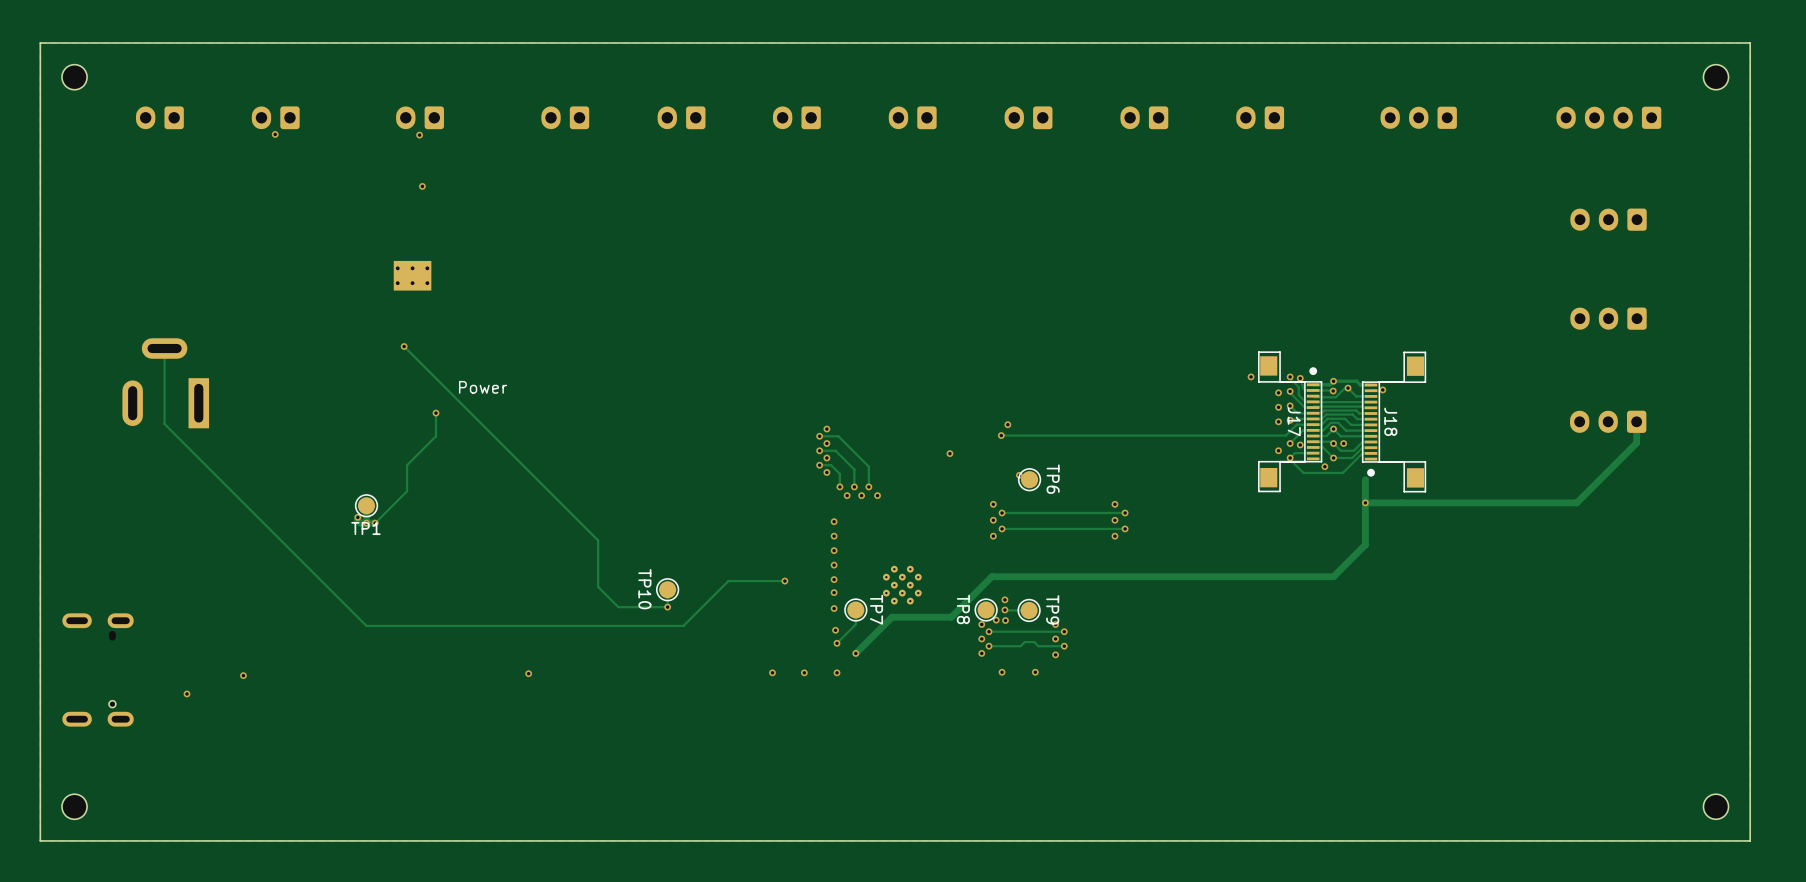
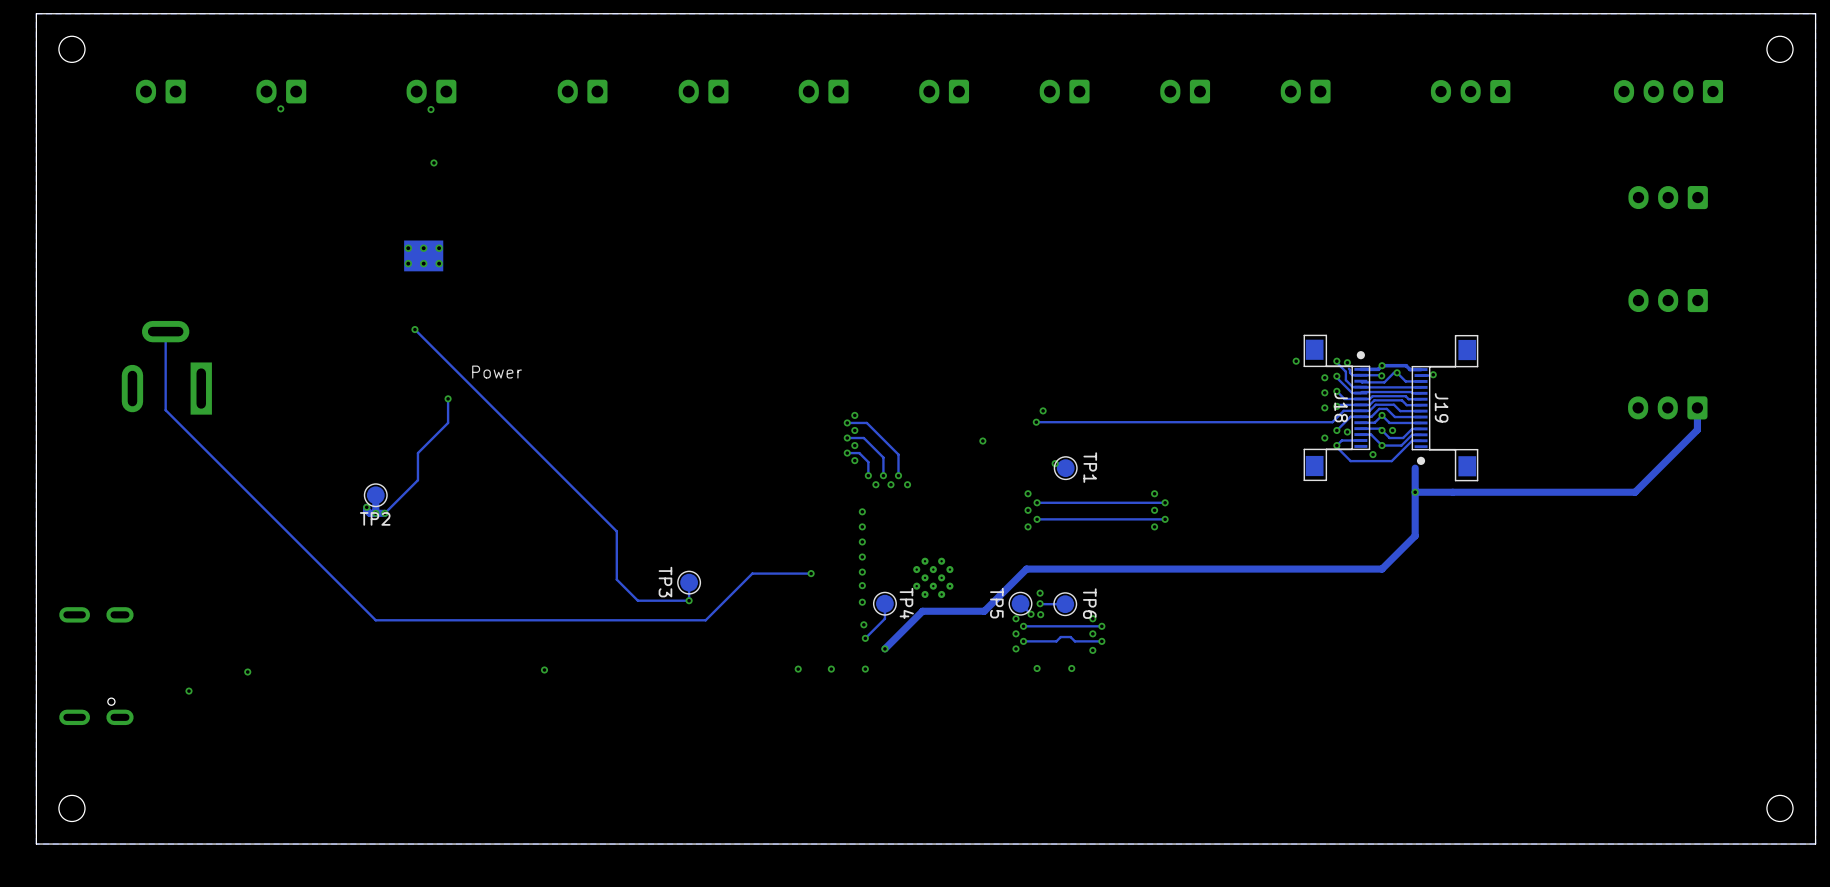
J17 name: J17 (1294, 421) -> J18 (1341, 407)
J18 name: J18 (1390, 421) -> J19 (1441, 407)
TP6 name: TP6 (1053, 479) -> TP1 (1090, 467)
TP1 name: TP1 (365, 528) -> TP2 (375, 518)
TP10 name: TP10 (644, 589) -> TP3 (665, 582)
TP7 name: TP7 (876, 609) -> TP4 (906, 603)
TP8 name: TP8 (963, 609) -> TP5 (996, 603)
TP9 name: TP9 (1052, 609) -> TP6 (1089, 603)

